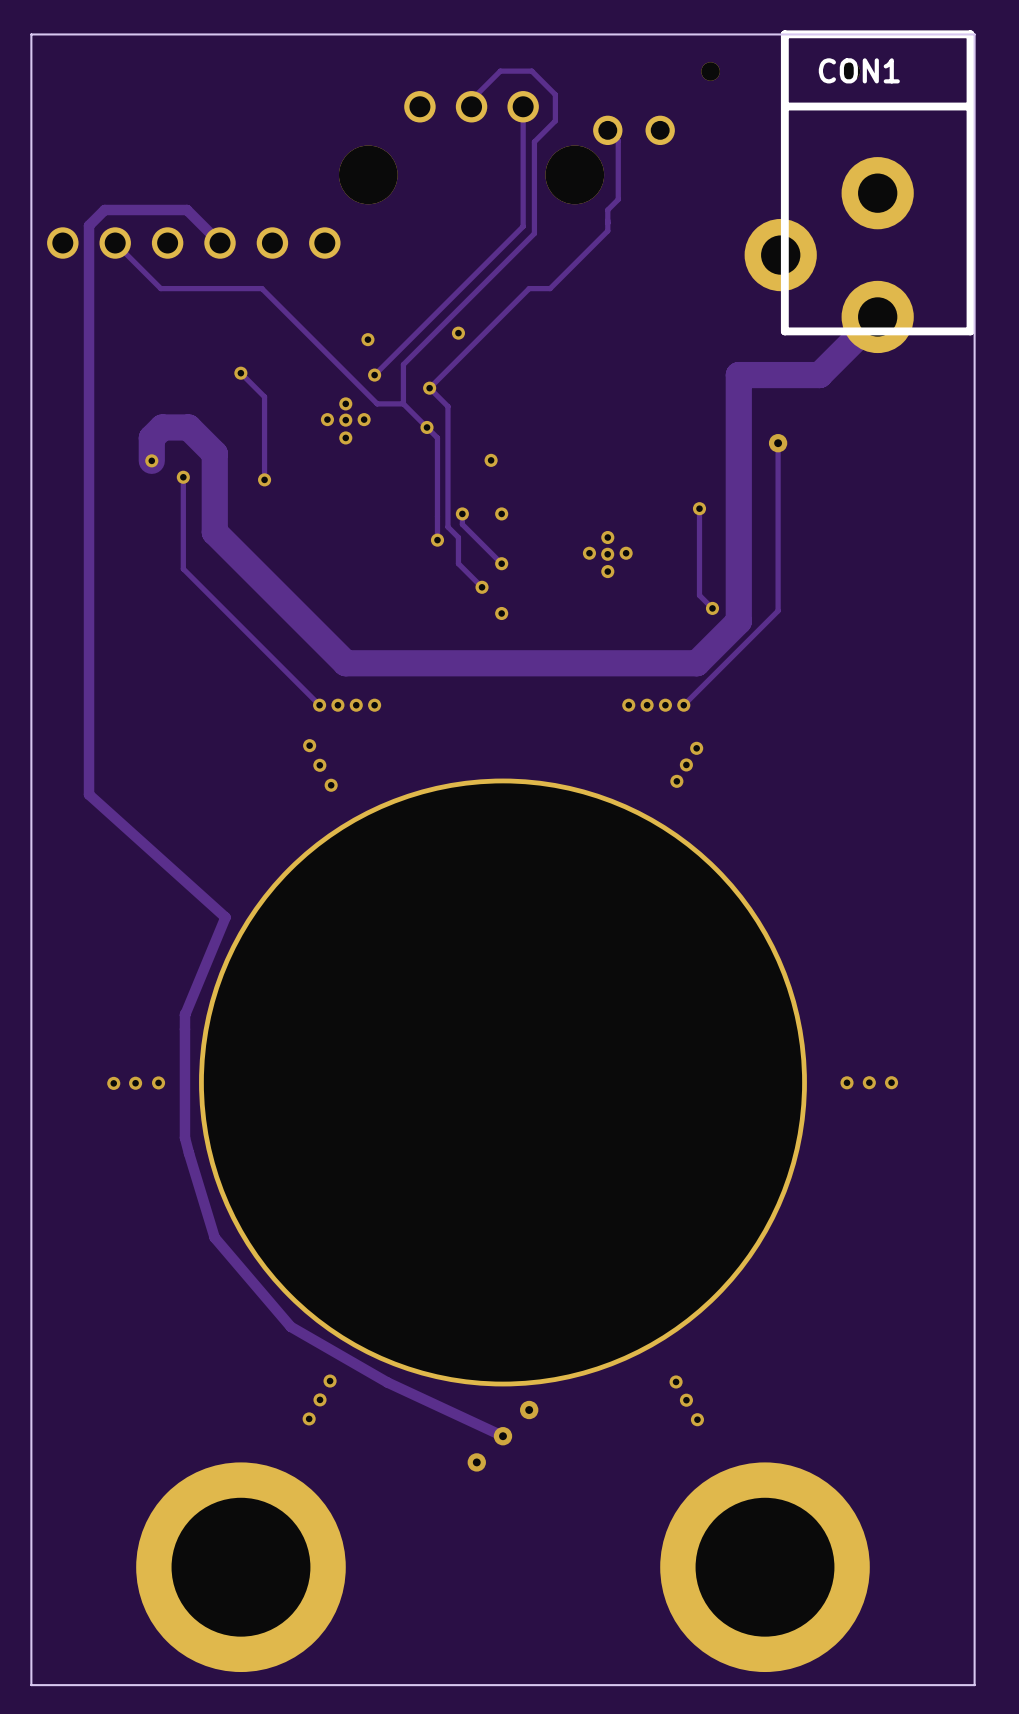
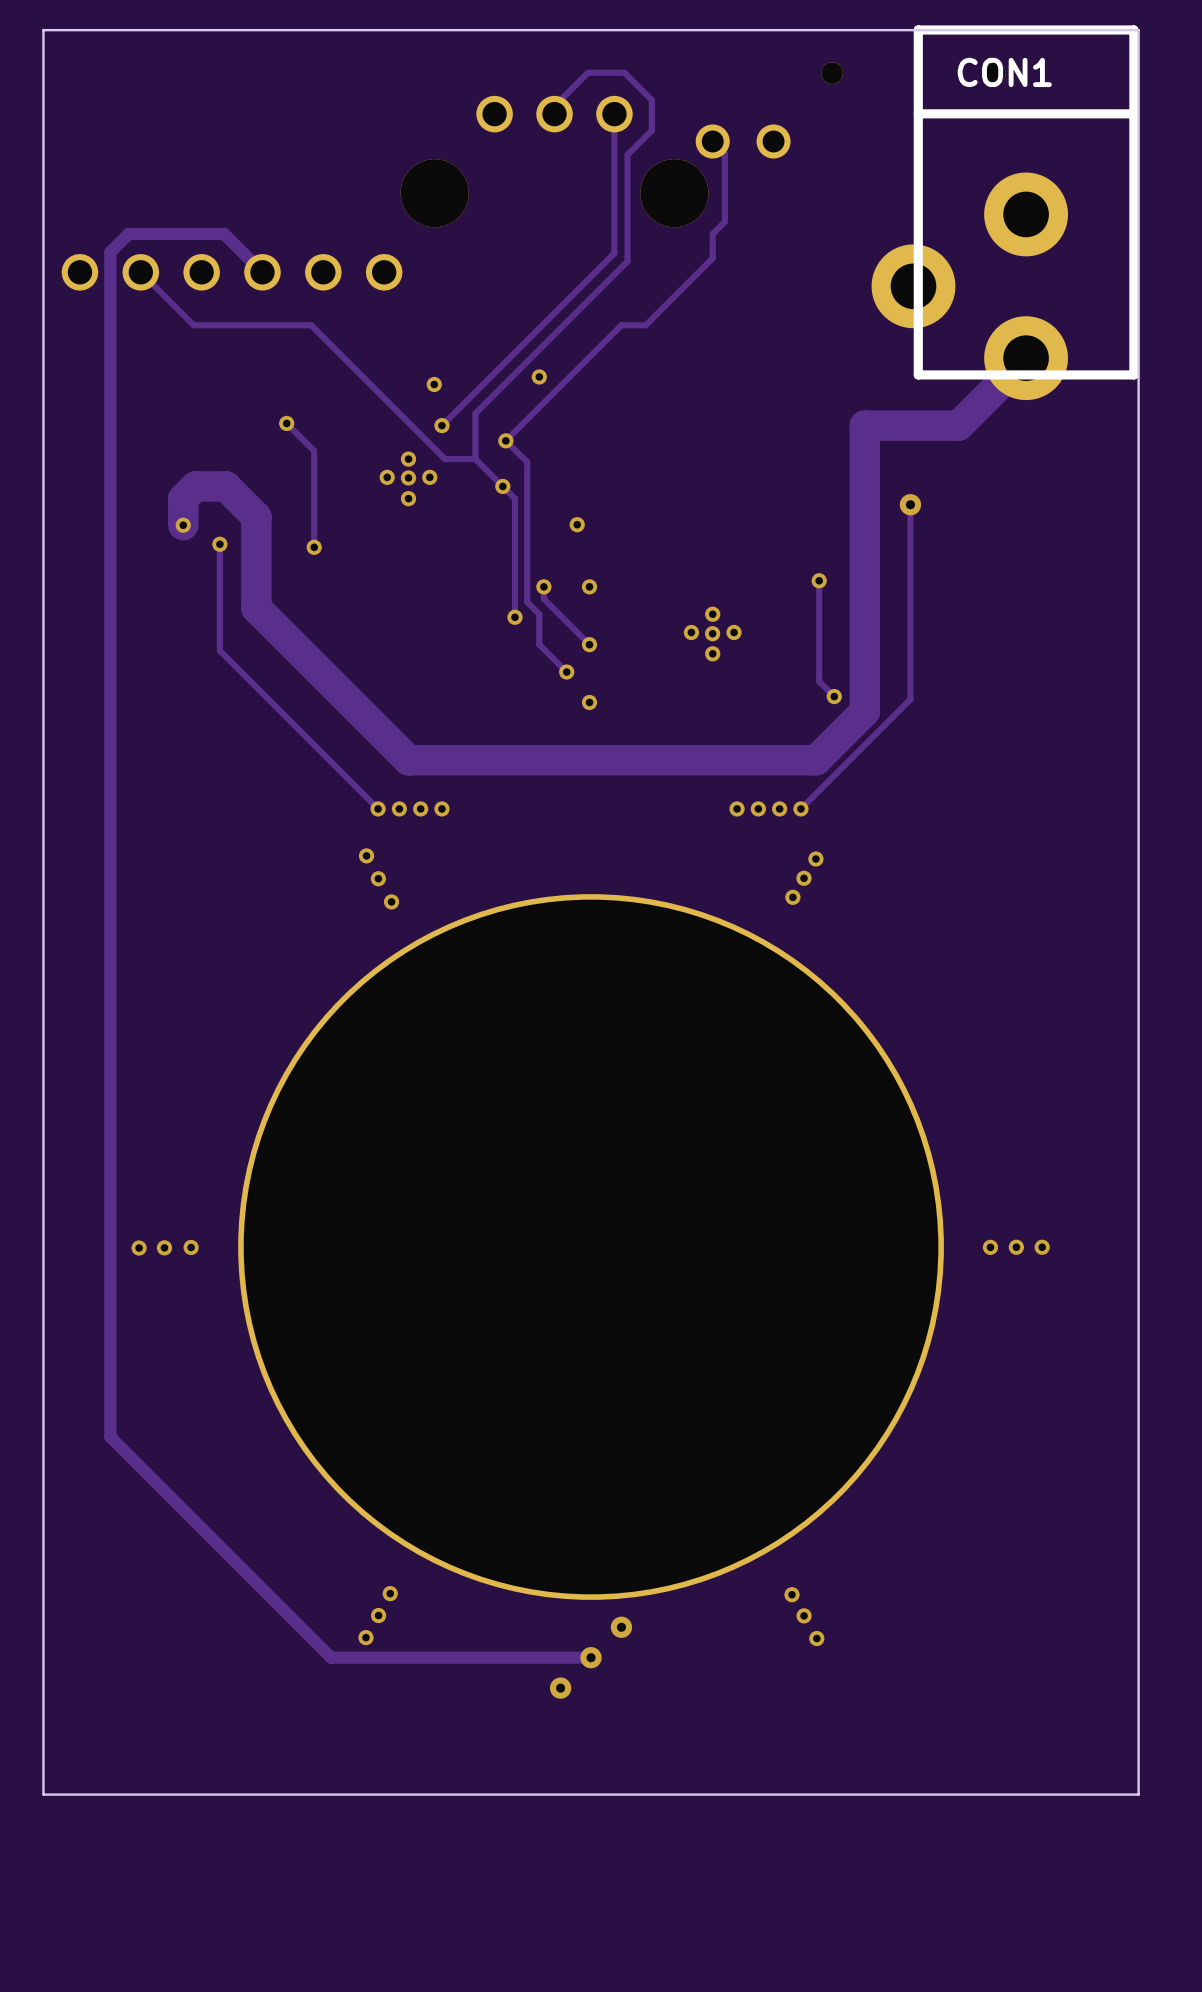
track: (89, 794) (225, 917) (185, 1015) -> none
track: (185, 1013) (184, 1137) (214, 1237) (290, 1326) (387, 1382) (502, 1436) -> (110, 912) (110, 1436) (331, 1657) (591, 1657)
board edge: (974, 1554) (974, 1685) (31, 1685) (31, 1554) -> (1138, 1794) (43, 1794)
part: (240, 1567) -> none
part: (765, 1567) -> none

